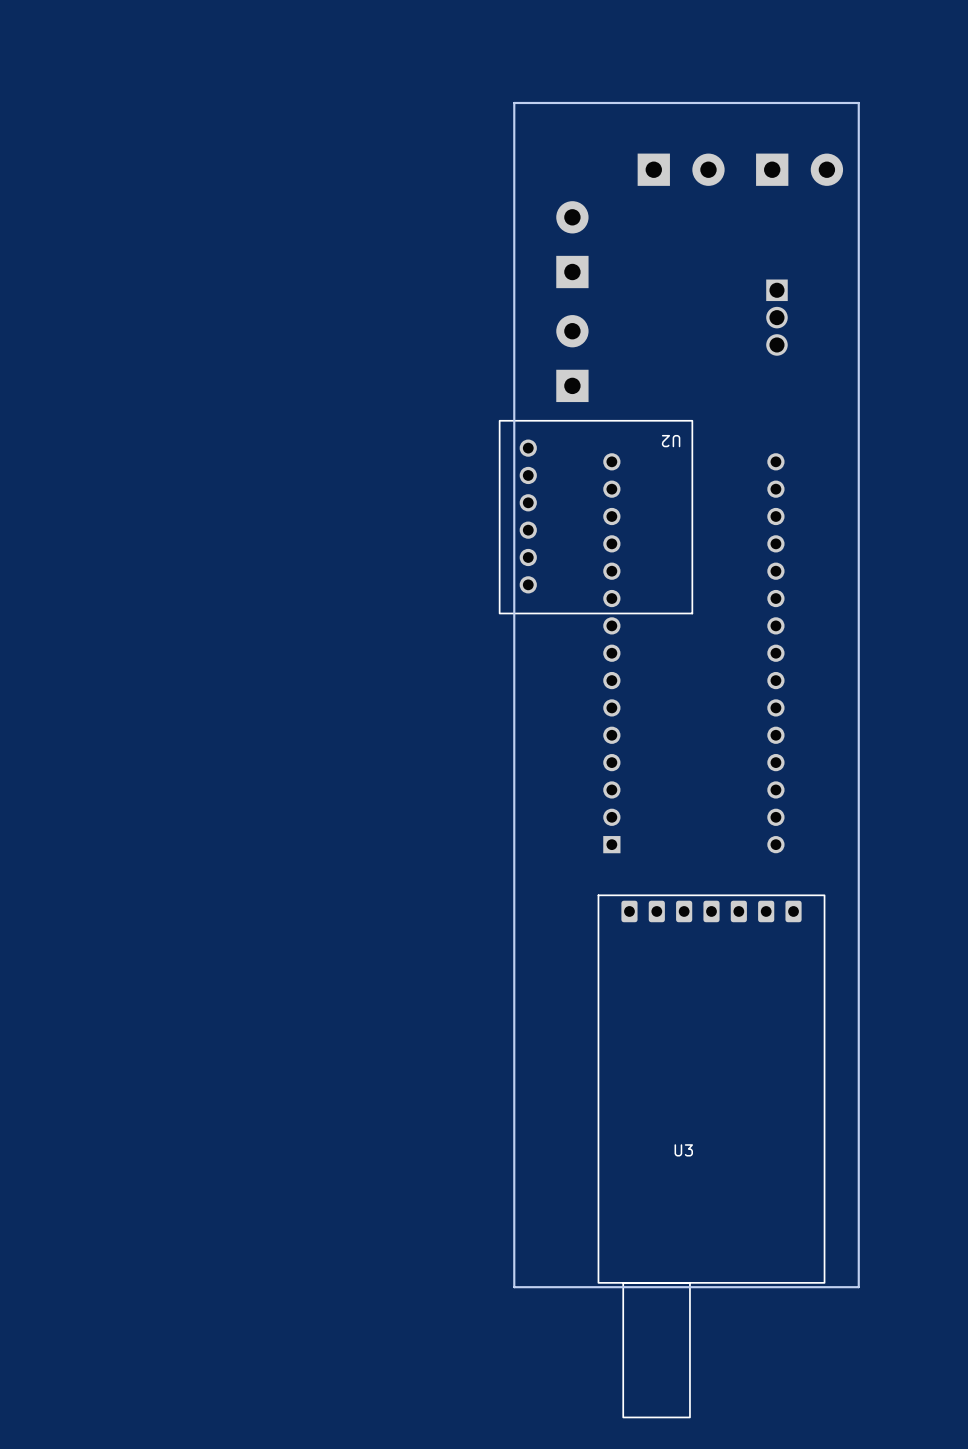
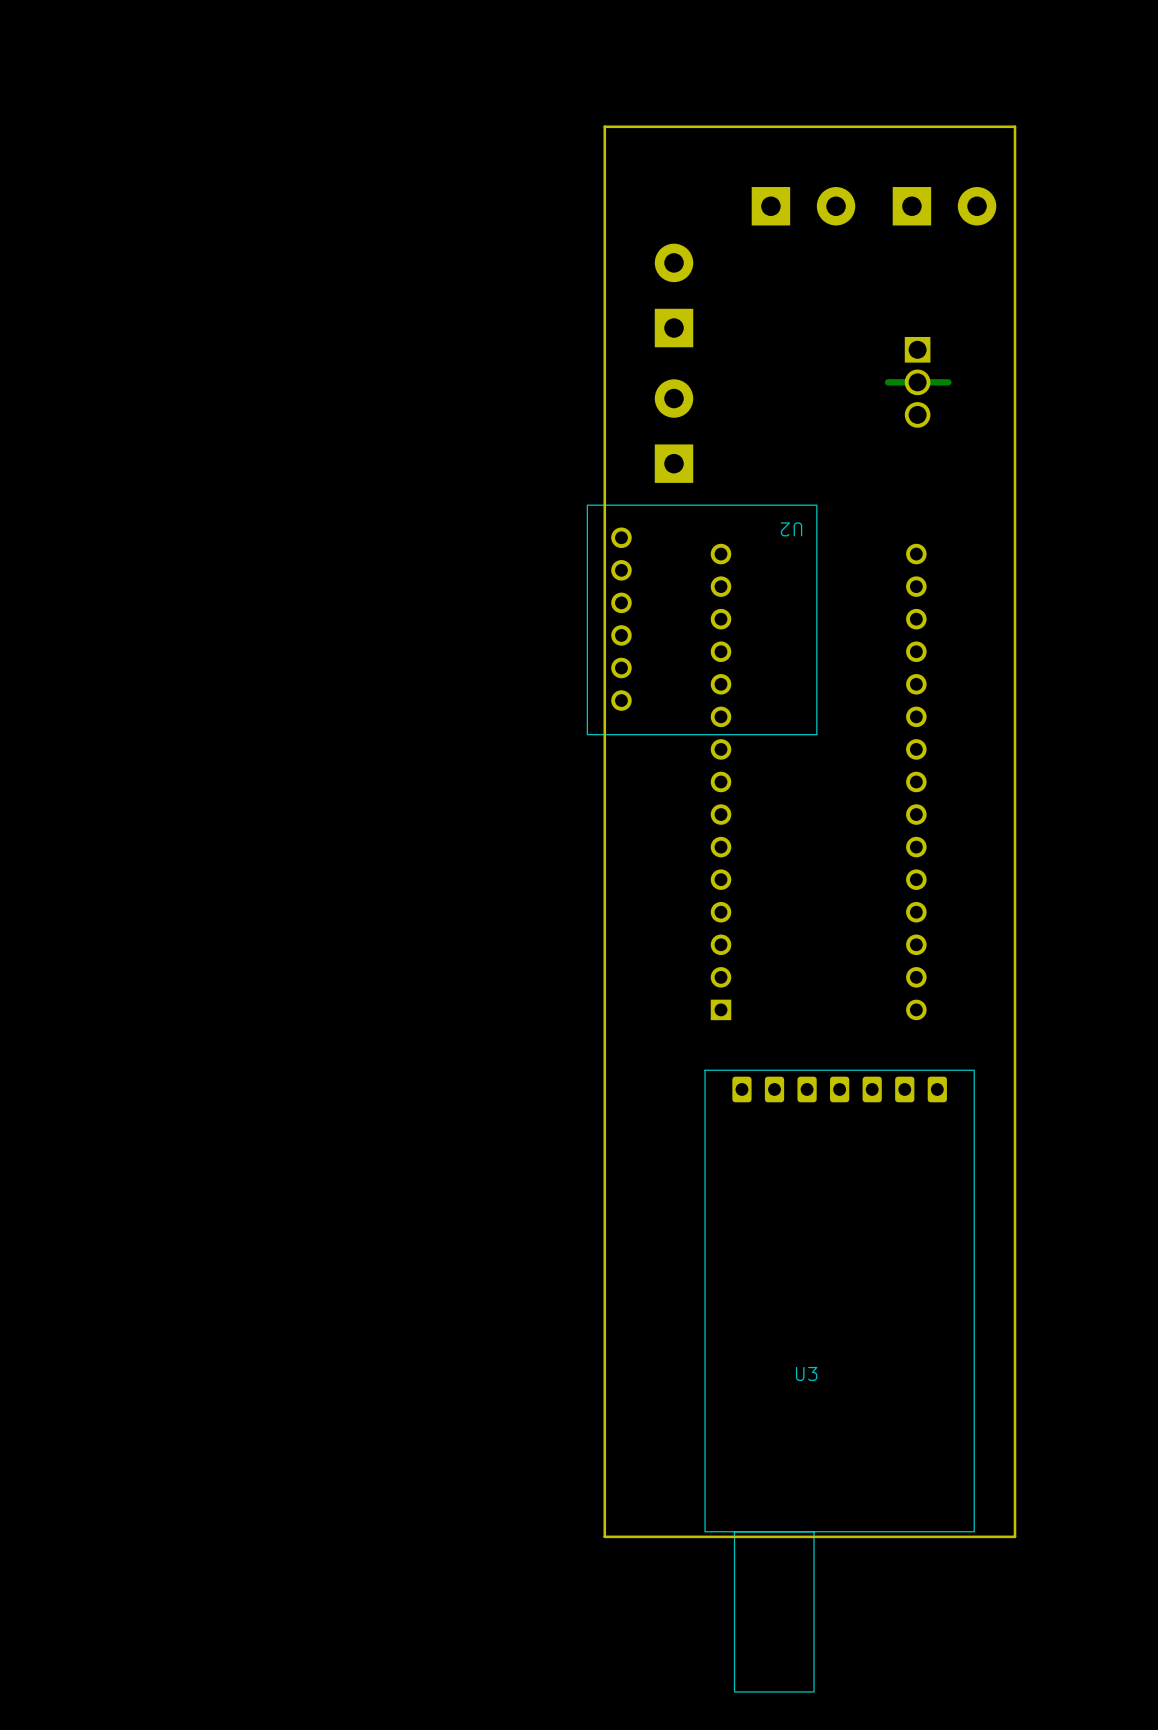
track: none -> (948, 382) (888, 382)

